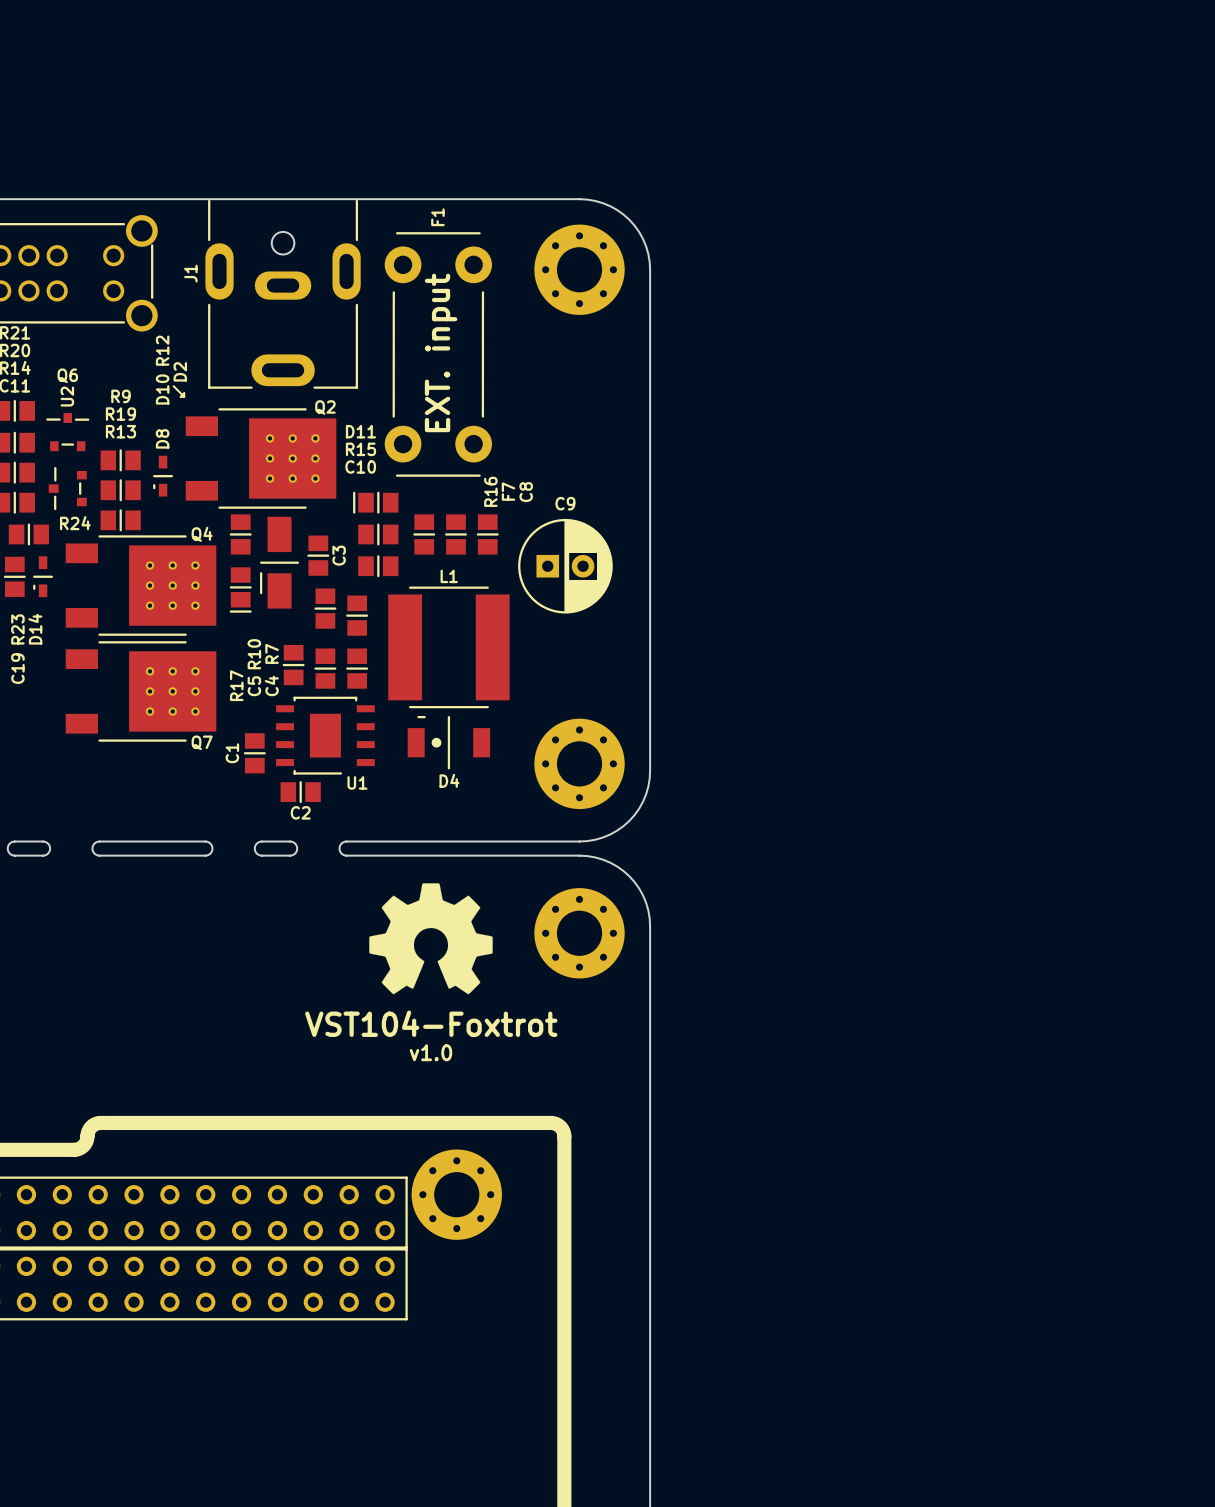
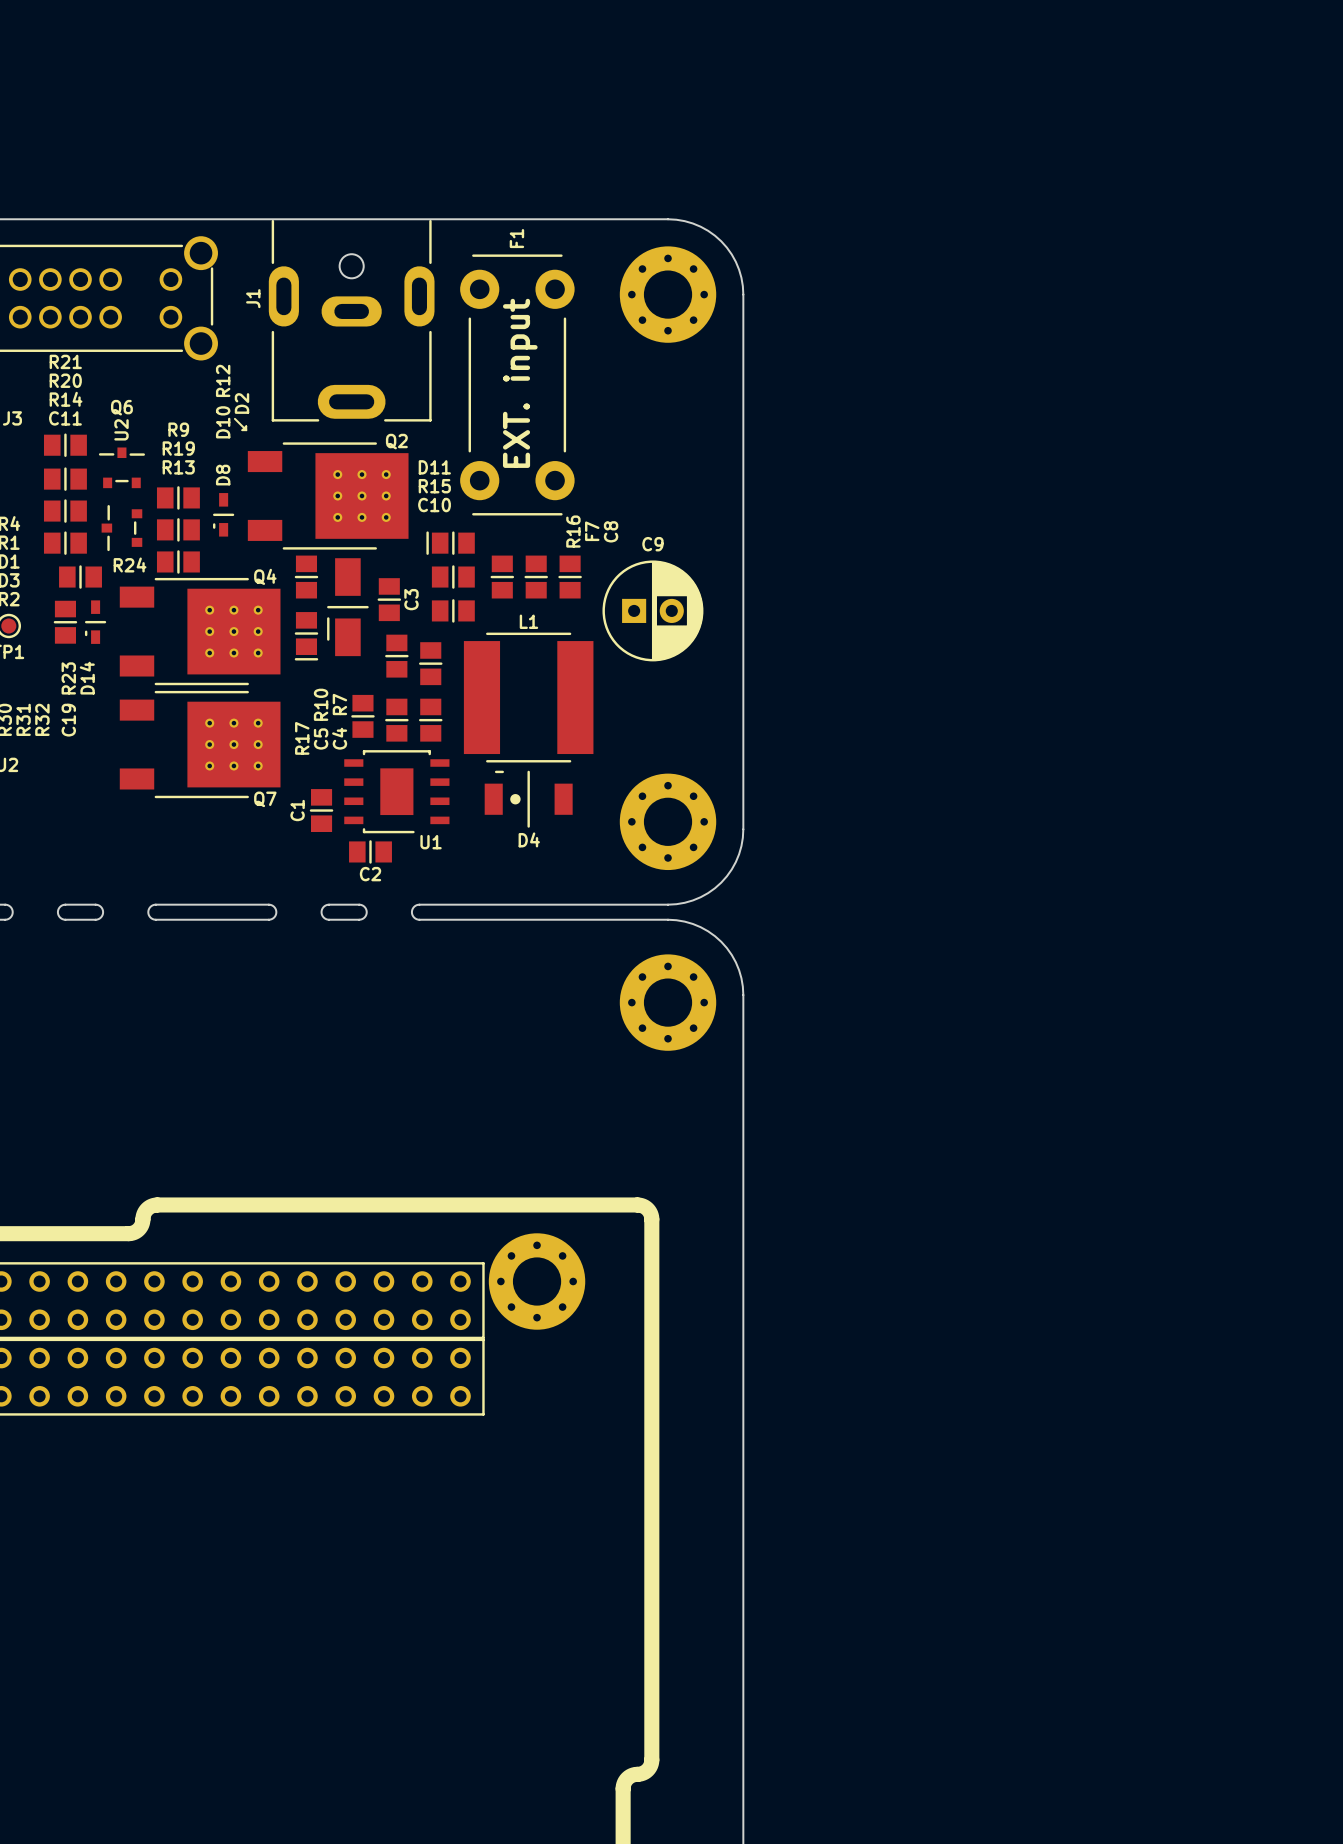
drawing: [369, 883, 493, 995] -> none
text: VST104-Foxtrot (431, 1023) -> none
text: v1.0 (430, 1052) -> none

